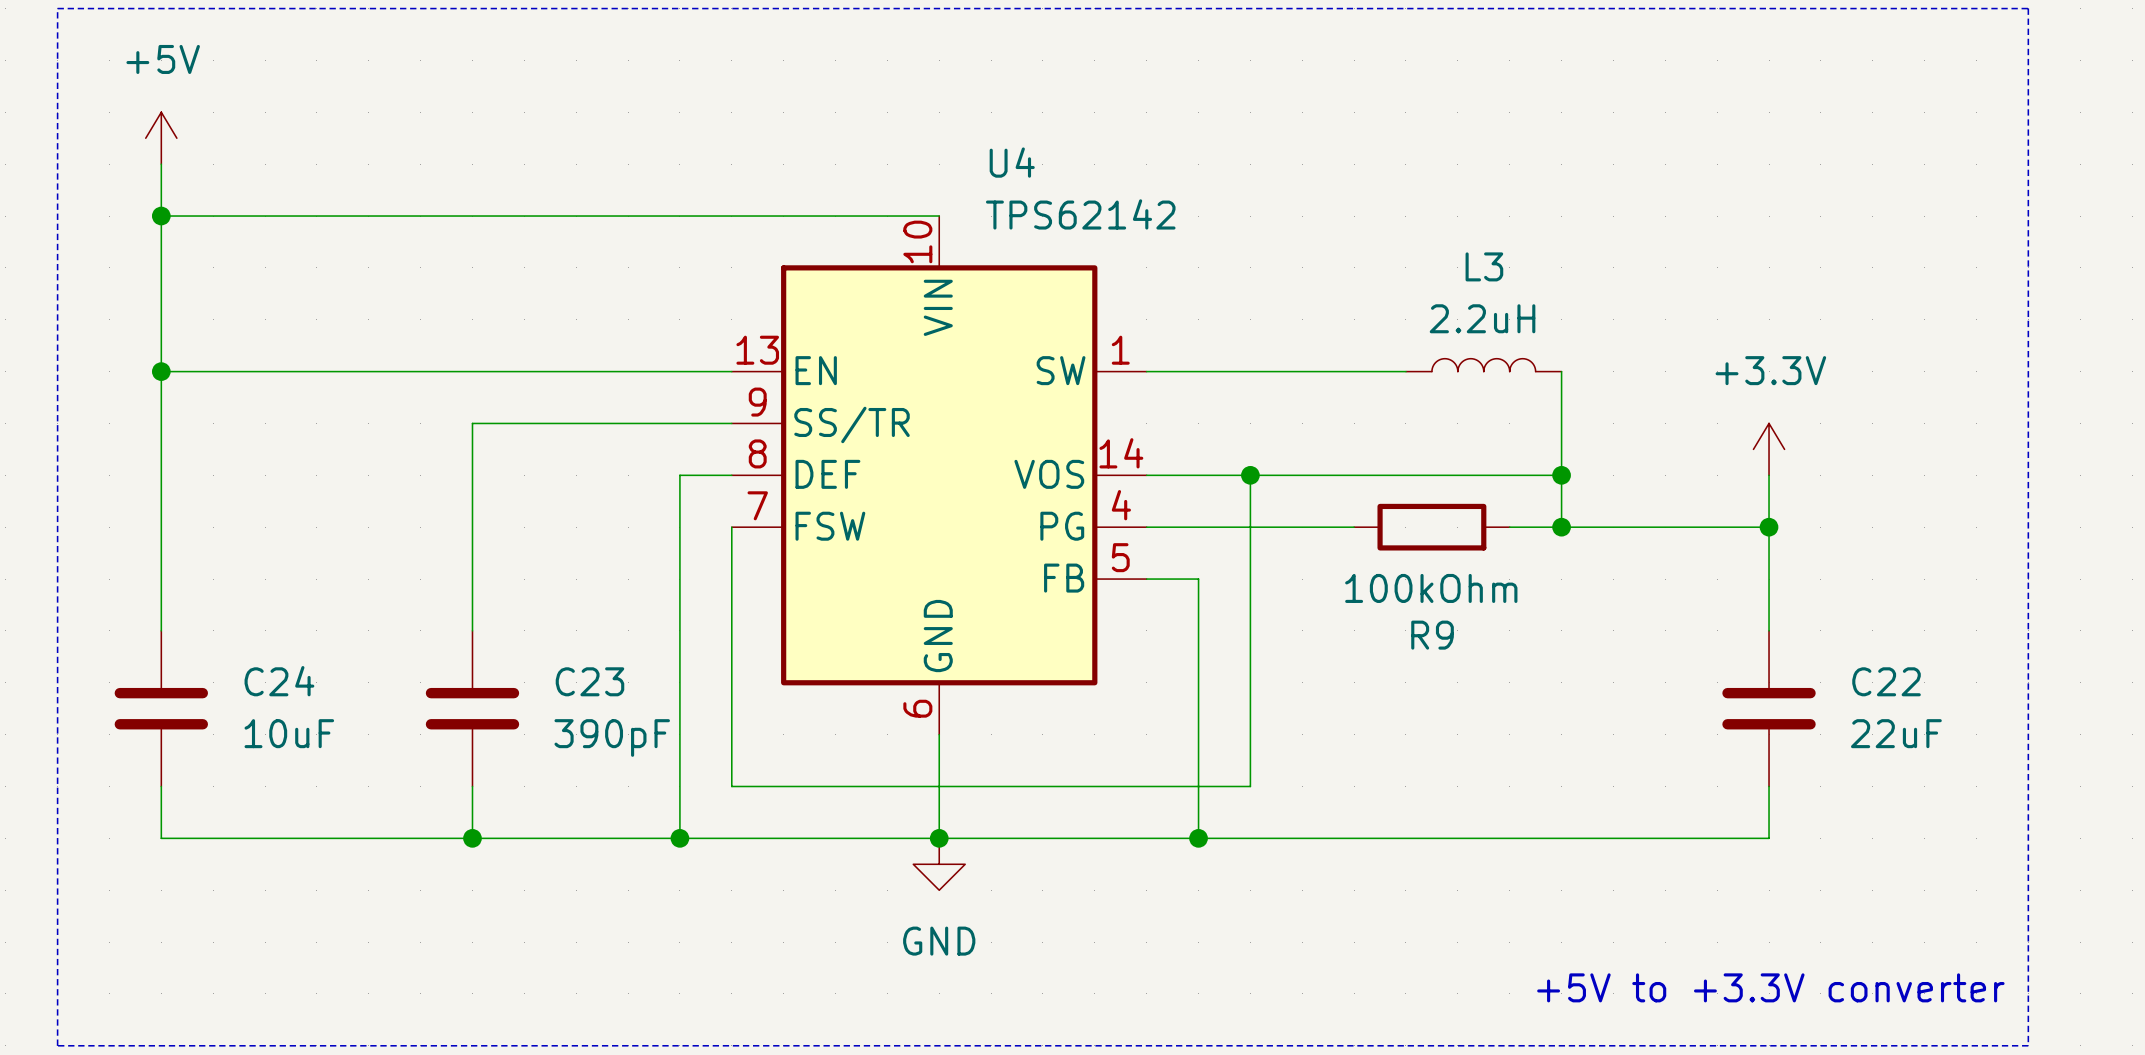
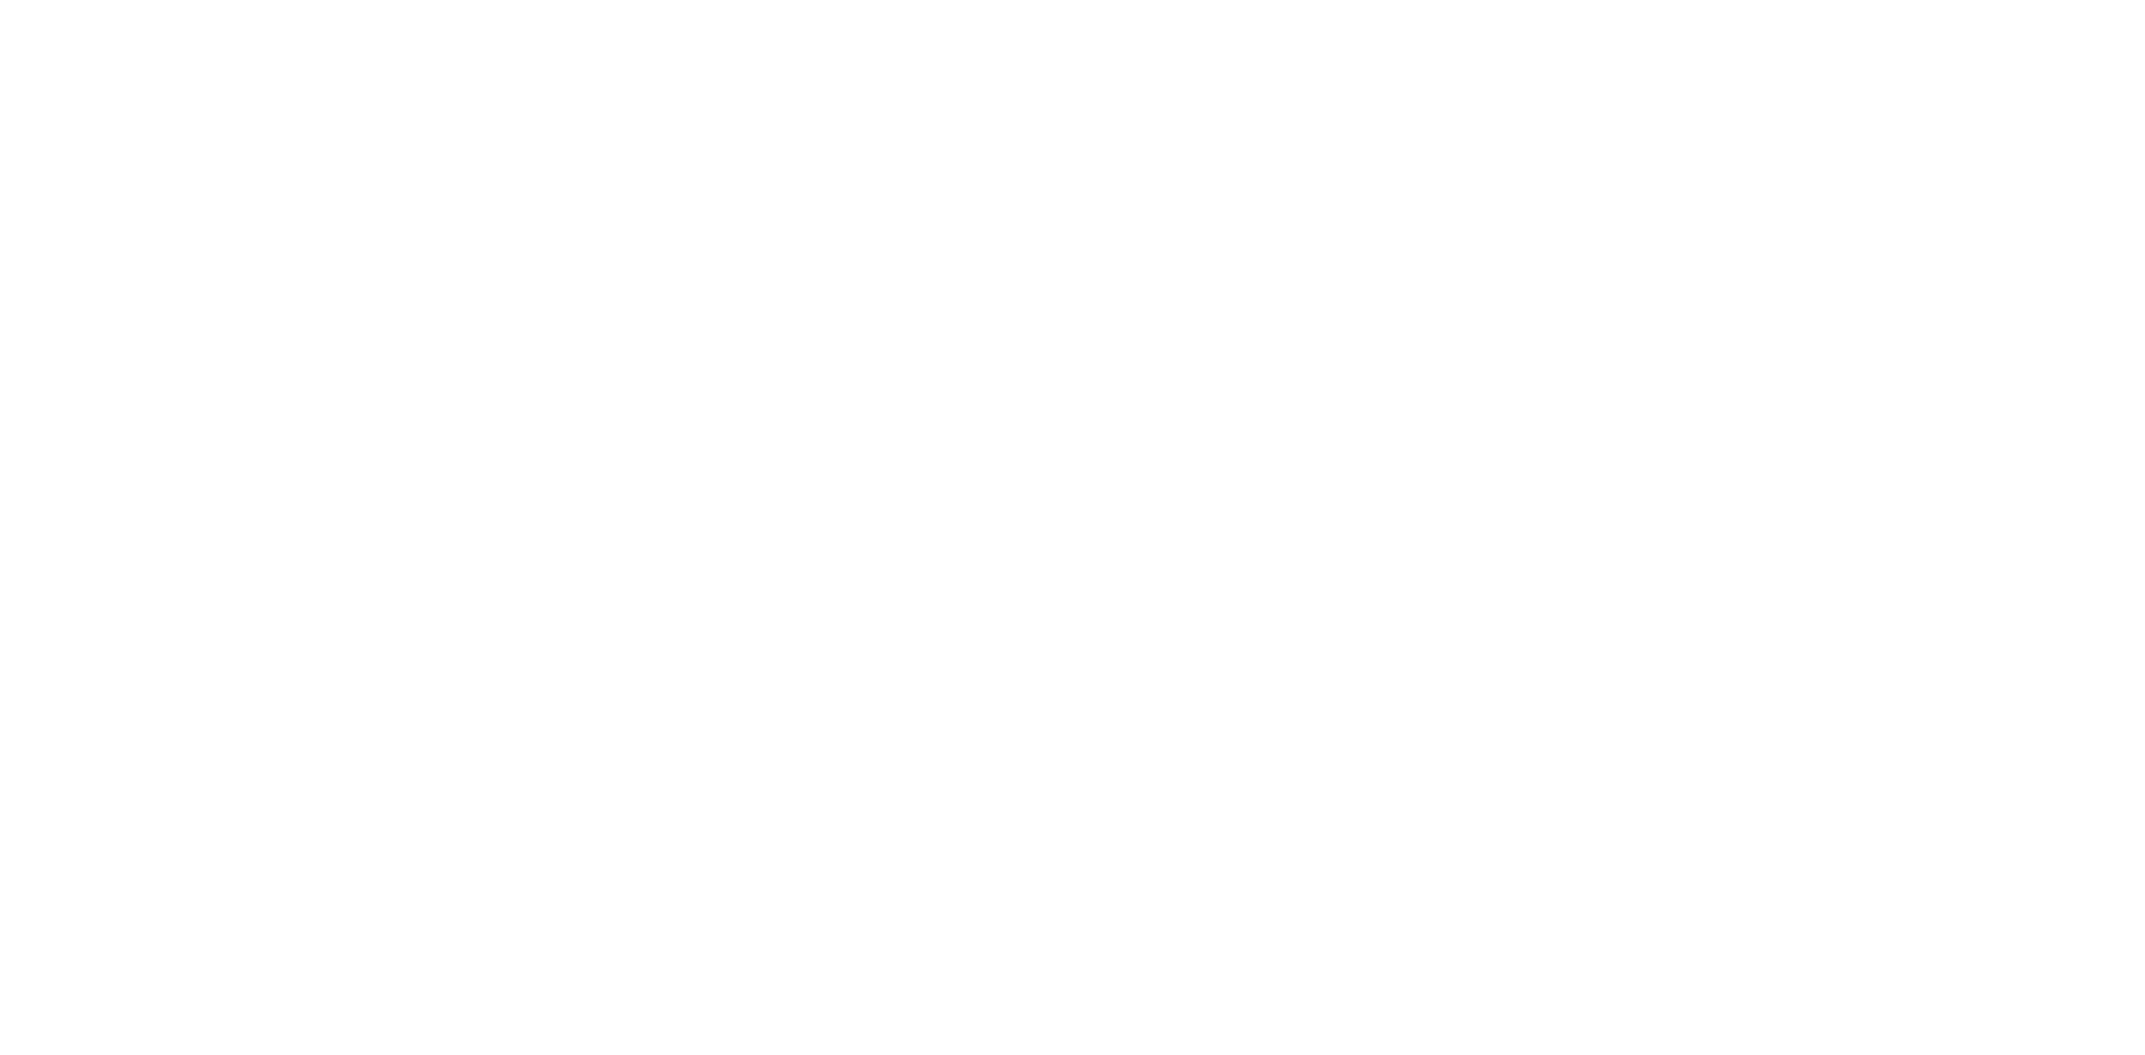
line: (57, 8) (2028, 8) (2028, 1045) (57, 1045) (57, 8) -> none
power symbol: +5V (161, 138) -> none
wire: (161, 164) (161, 630) -> none
wire: (161, 216) (939, 216) -> none
junction: (161, 216) -> none
L3: 2.2uH (1483, 365) -> none
wire: (161, 371) (731, 371) -> none
junction: (161, 371) -> none
wire: (1146, 371) (1405, 371) -> none
wire: (1561, 371) (1561, 527) -> none
wire: (731, 423) (472, 423) (472, 630) -> none
power symbol: +3.3V (1769, 449) -> none
wire: (731, 475) (679, 475) (679, 838) -> none
U4: TPS62142 (939, 475) -> none
wire: (1146, 475) (1561, 475) -> none
wire: (1250, 475) (1250, 786) (731, 786) (731, 527) -> none
junction: (1250, 475) -> none
junction: (1561, 475) -> none
wire: (1769, 475) (1769, 630) -> none
wire: (1146, 527) (1354, 527) -> none
R9: 100kOhm (1431, 527) -> none
wire: (1509, 527) (1769, 527) -> none
junction: (1561, 527) -> none
junction: (1769, 527) -> none
wire: (1146, 579) (1198, 579) (1198, 838) -> none
C24: 10uF (161, 708) -> none
C23: 390pF (472, 708) -> none
C22: 22uF (1769, 708) -> none
wire: (939, 734) (939, 838) -> none
wire: (161, 786) (161, 838) (1769, 838) (1769, 786) -> none
wire: (472, 786) (472, 838) -> none
junction: (472, 838) -> none
junction: (679, 838) -> none
junction: (939, 838) -> none
junction: (1198, 838) -> none
power symbol: GND (939, 864) -> none
text: +5V to +3.3V converter (1770, 987) -> none

